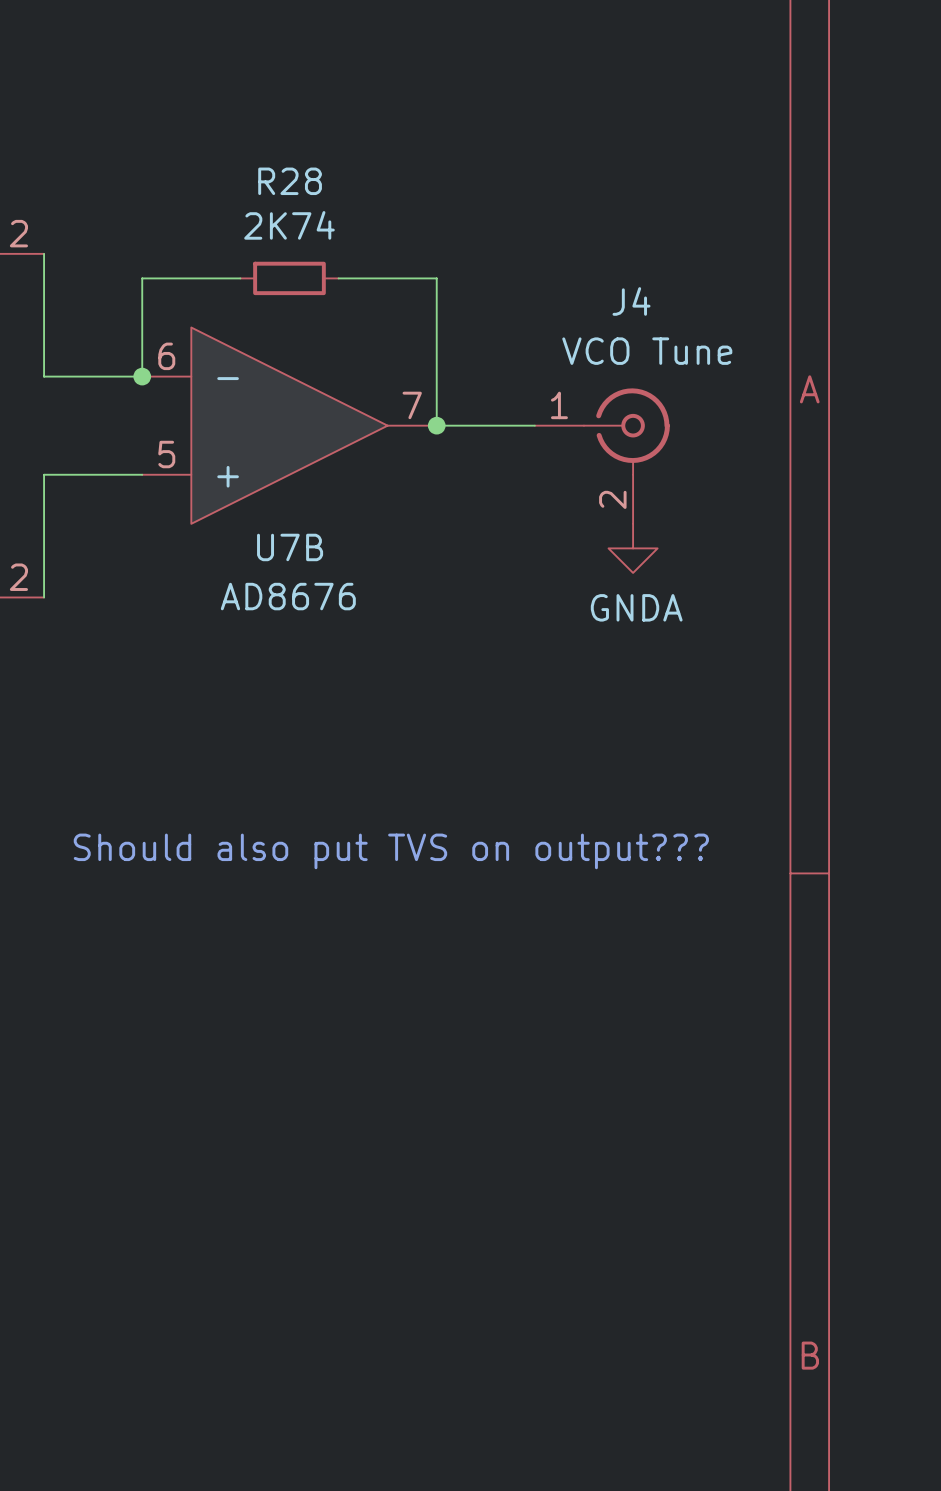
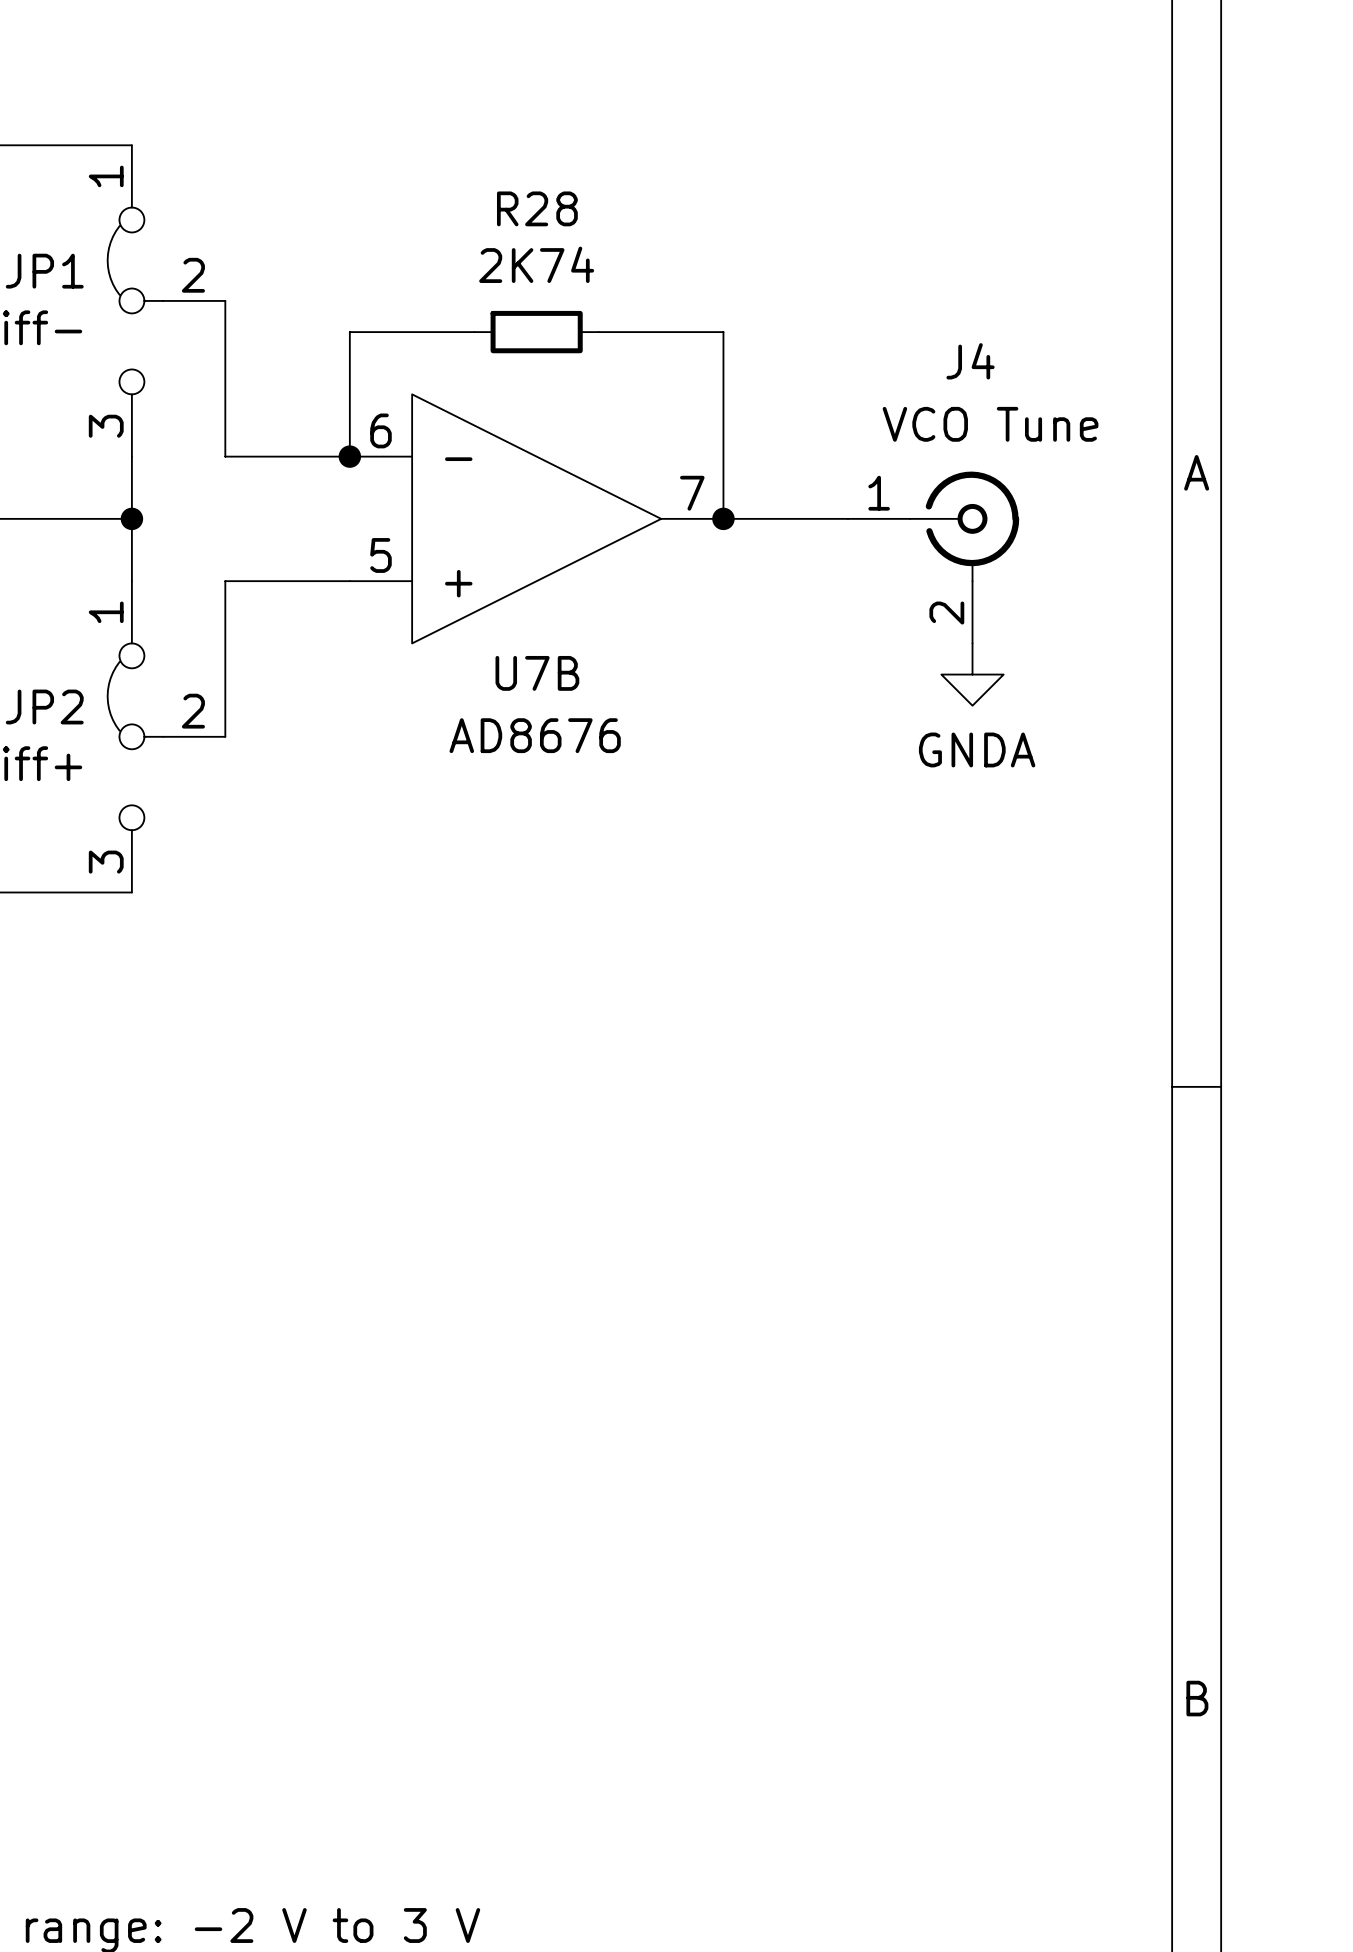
text: Should also put TVS on output??? (391, 851) -> none

